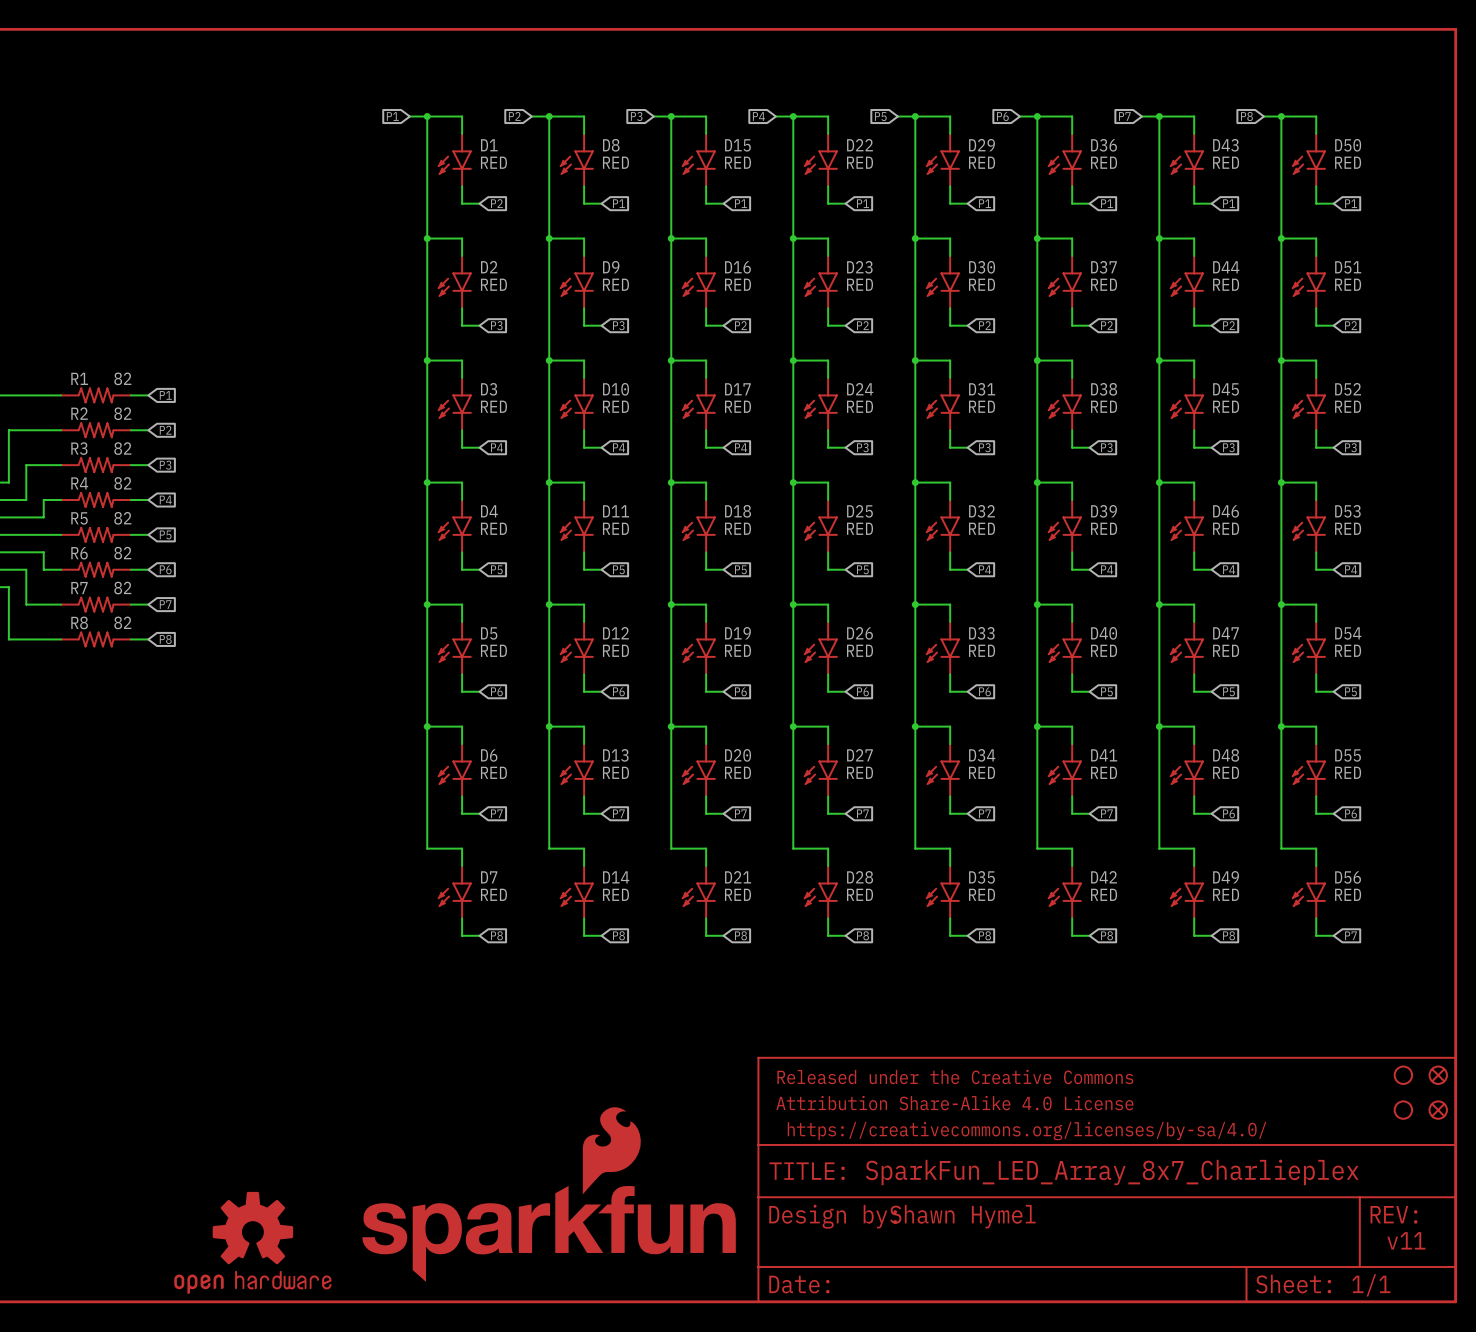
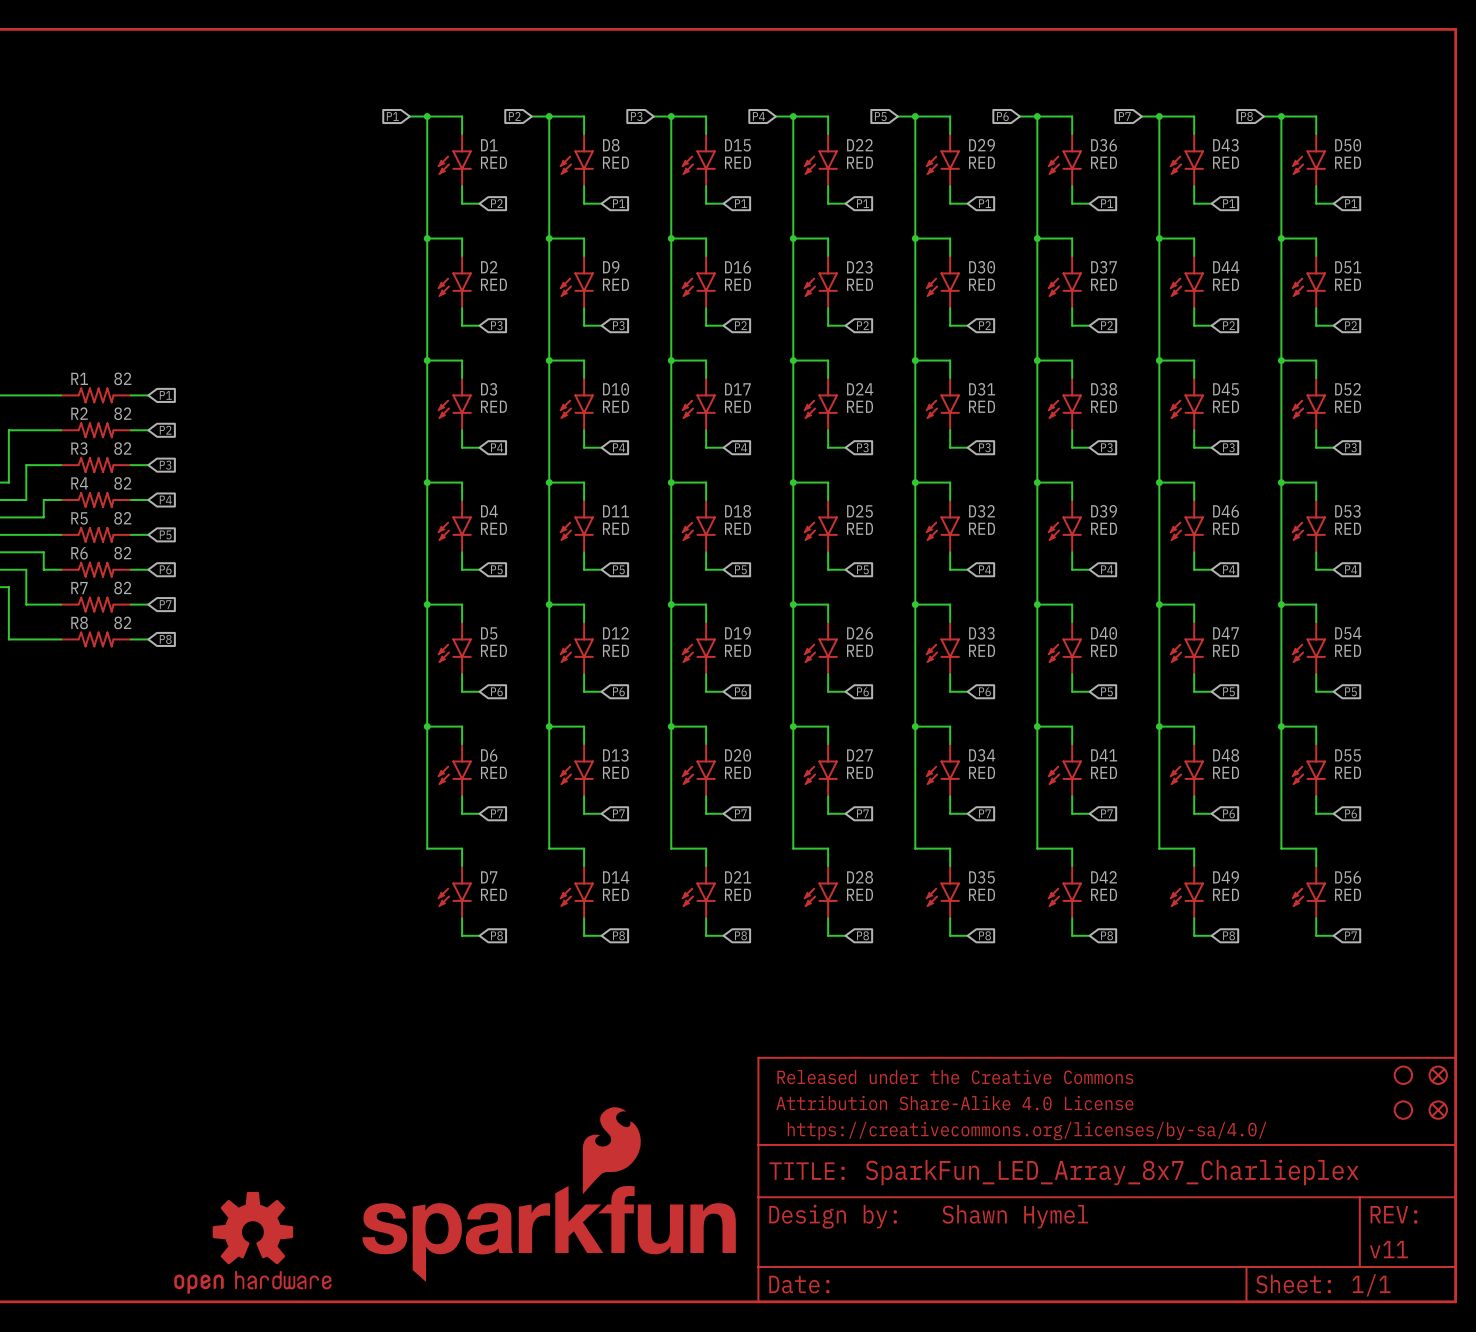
part text: Shawn Hymel (962, 1216) -> none
part text: none -> Shawn Hymel (1015, 1216)
part text: v11 (1406, 1240) -> none
part text: none -> v11 (1388, 1249)

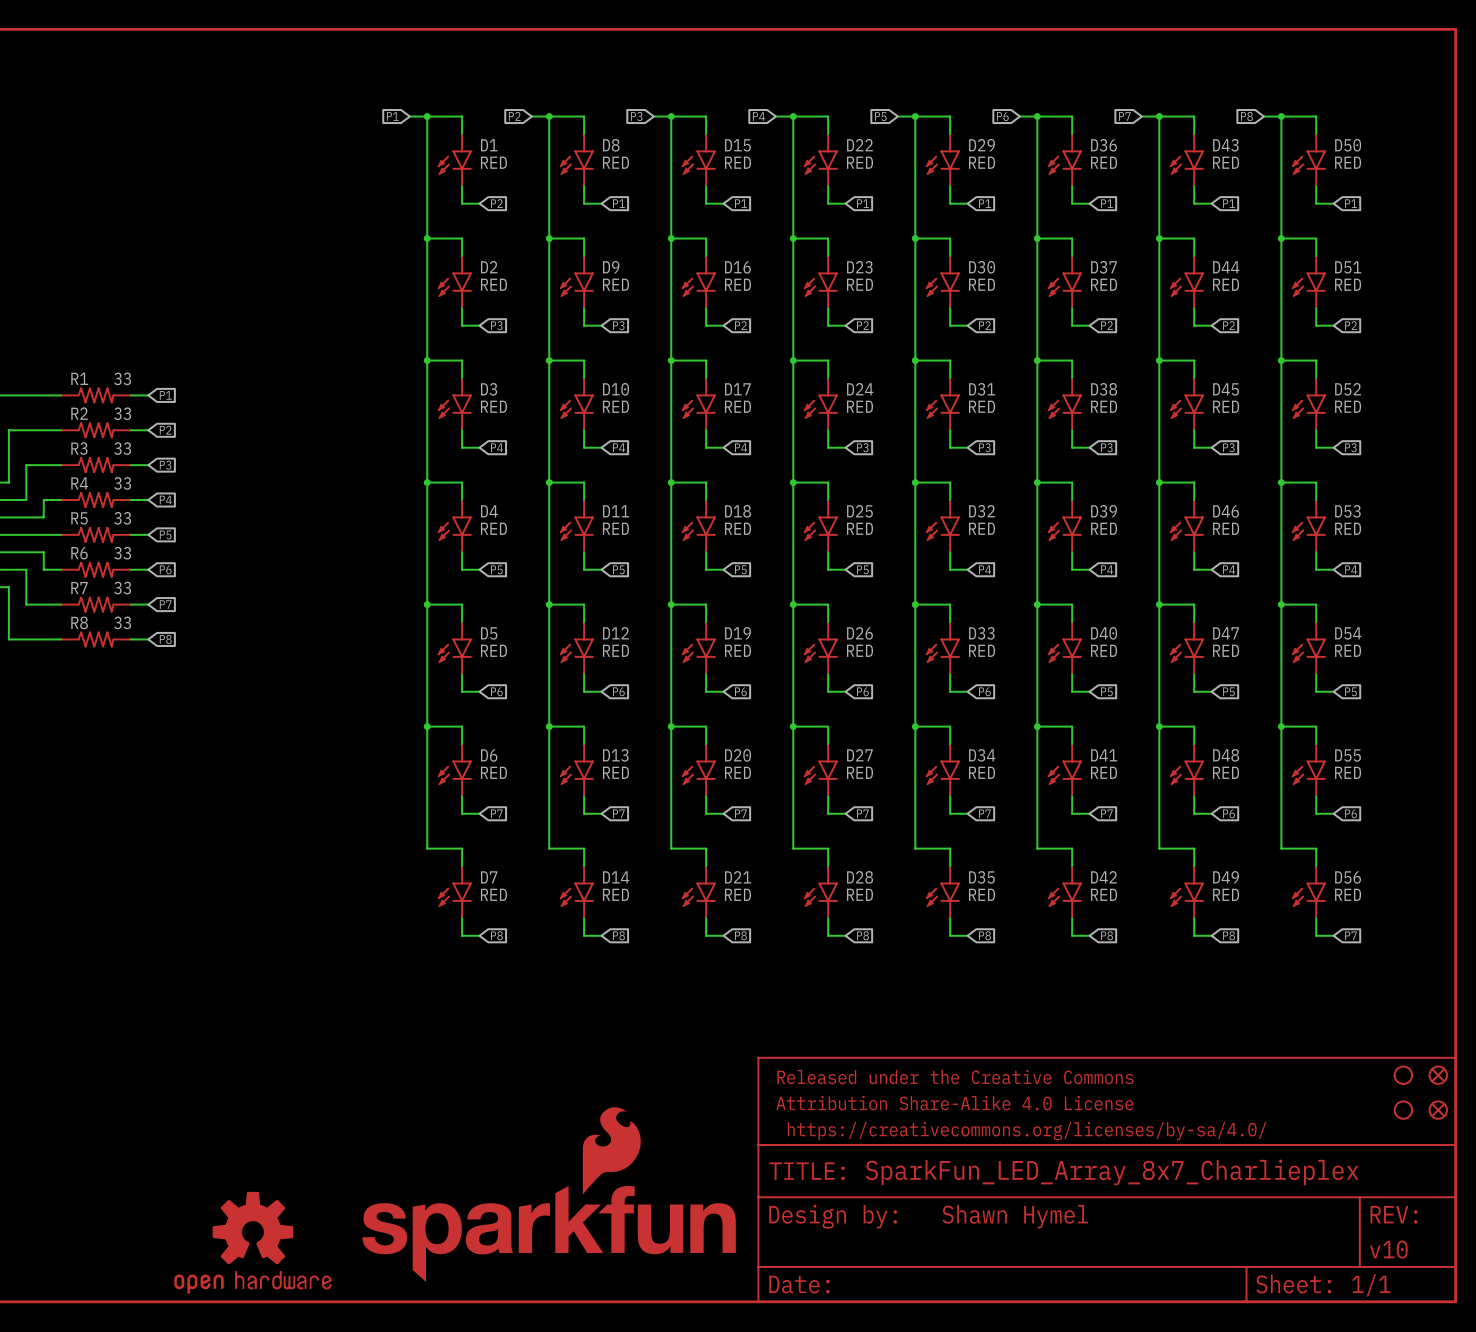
R1 value: 82 (122, 378) -> 33 (122, 378)
R2 value: 82 (122, 413) -> 33 (122, 413)
R3 value: 82 (122, 448) -> 33 (122, 448)
R4 value: 82 (122, 483) -> 33 (122, 483)
R5 value: 82 (122, 518) -> 33 (122, 518)
R6 value: 82 (122, 553) -> 33 (122, 553)
R7 value: 82 (122, 588) -> 33 (122, 588)
R8 value: 82 (122, 622) -> 33 (122, 622)
part text: v11 (1388, 1249) -> v10 (1388, 1249)

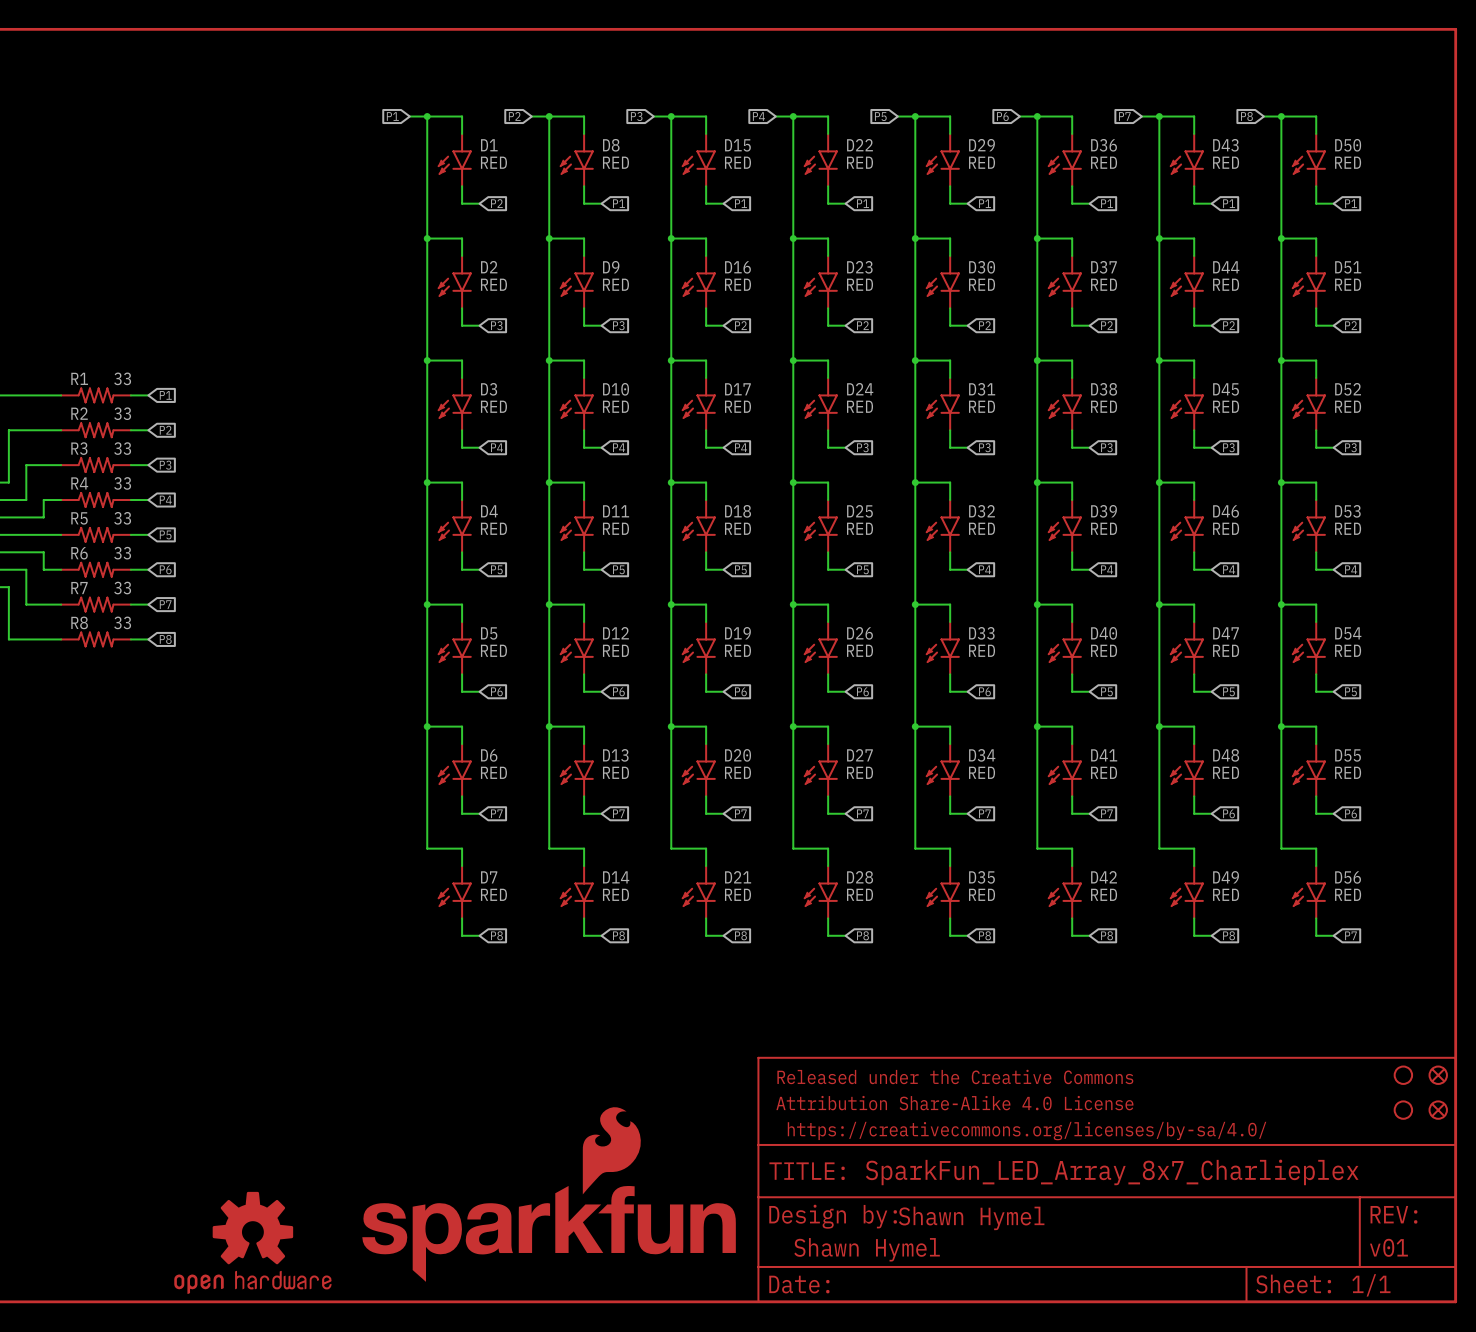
part text position: Shawn Hymel (1015, 1216) -> Shawn Hymel (867, 1249)
text: none -> Shawn Hymel (971, 1218)
part text: v10 (1388, 1249) -> v01 (1388, 1247)

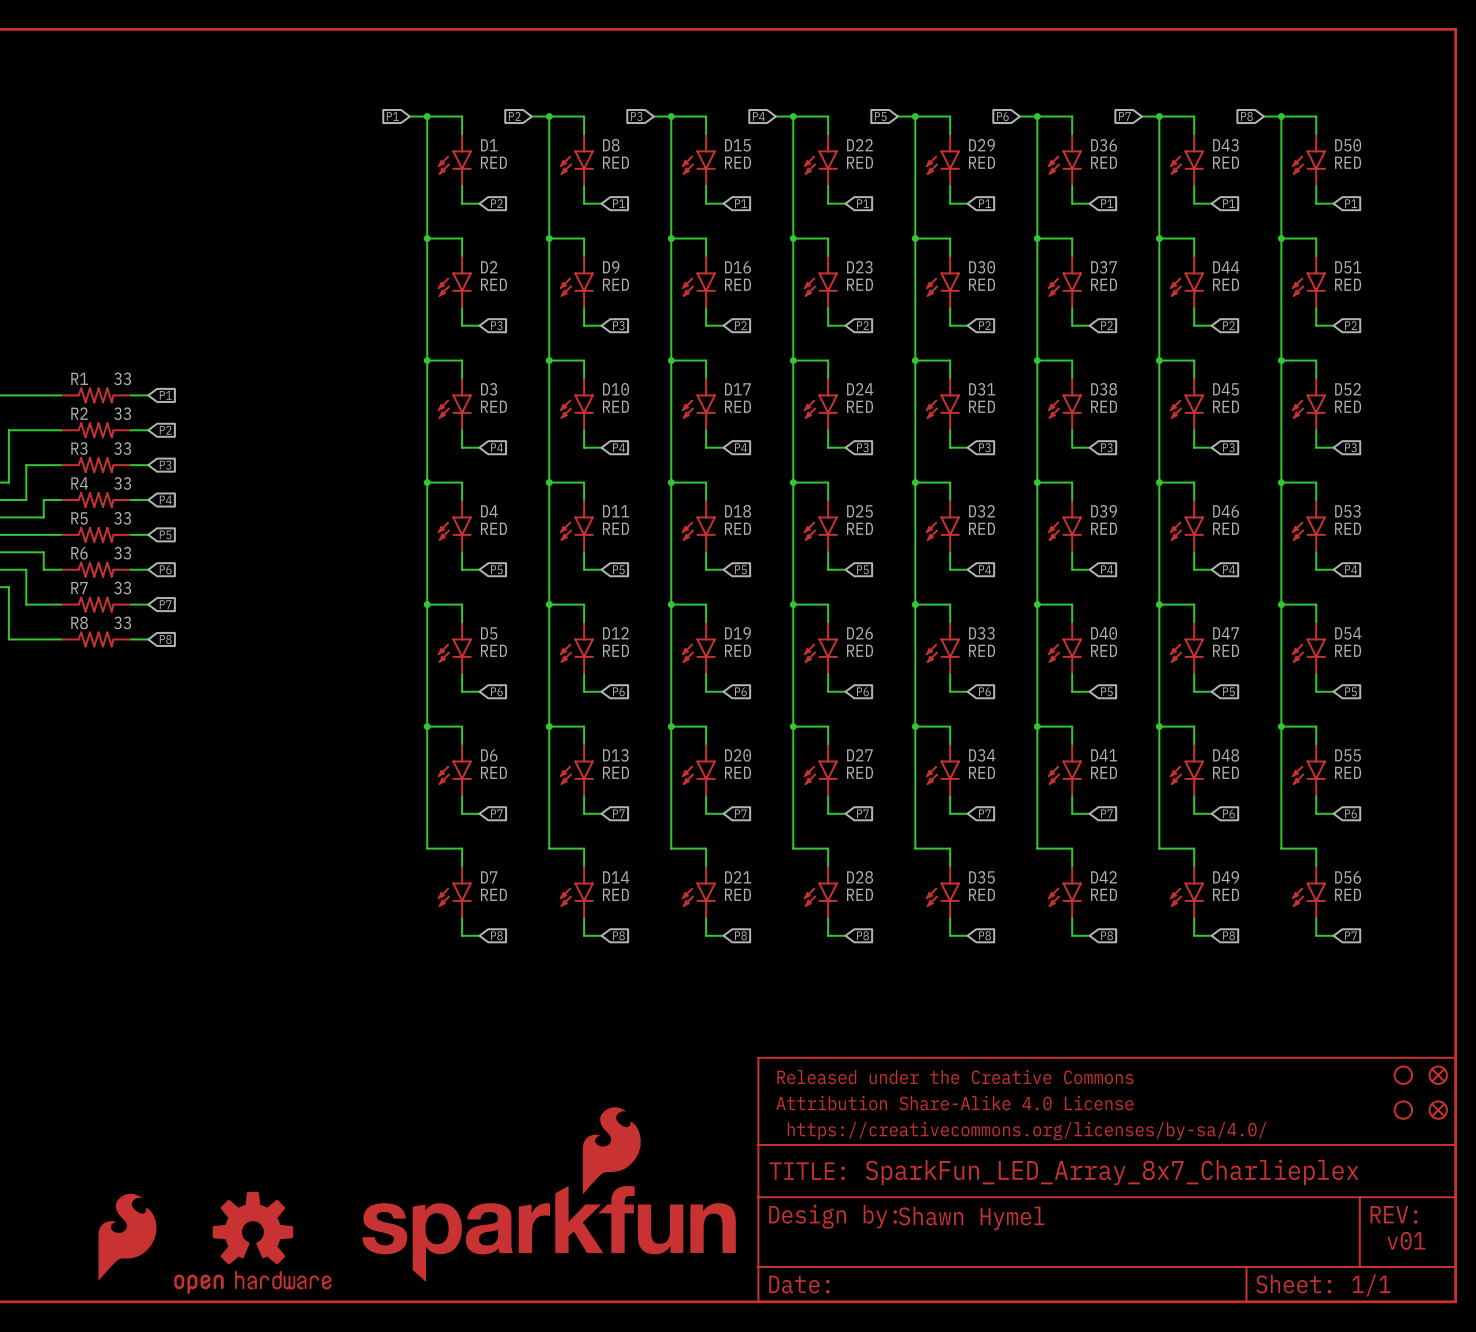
part: none -> (127, 1237)
text: none -> v01 (1406, 1240)
part text: v01 (1388, 1247) -> none
part text: Shawn Hymel (867, 1249) -> none

